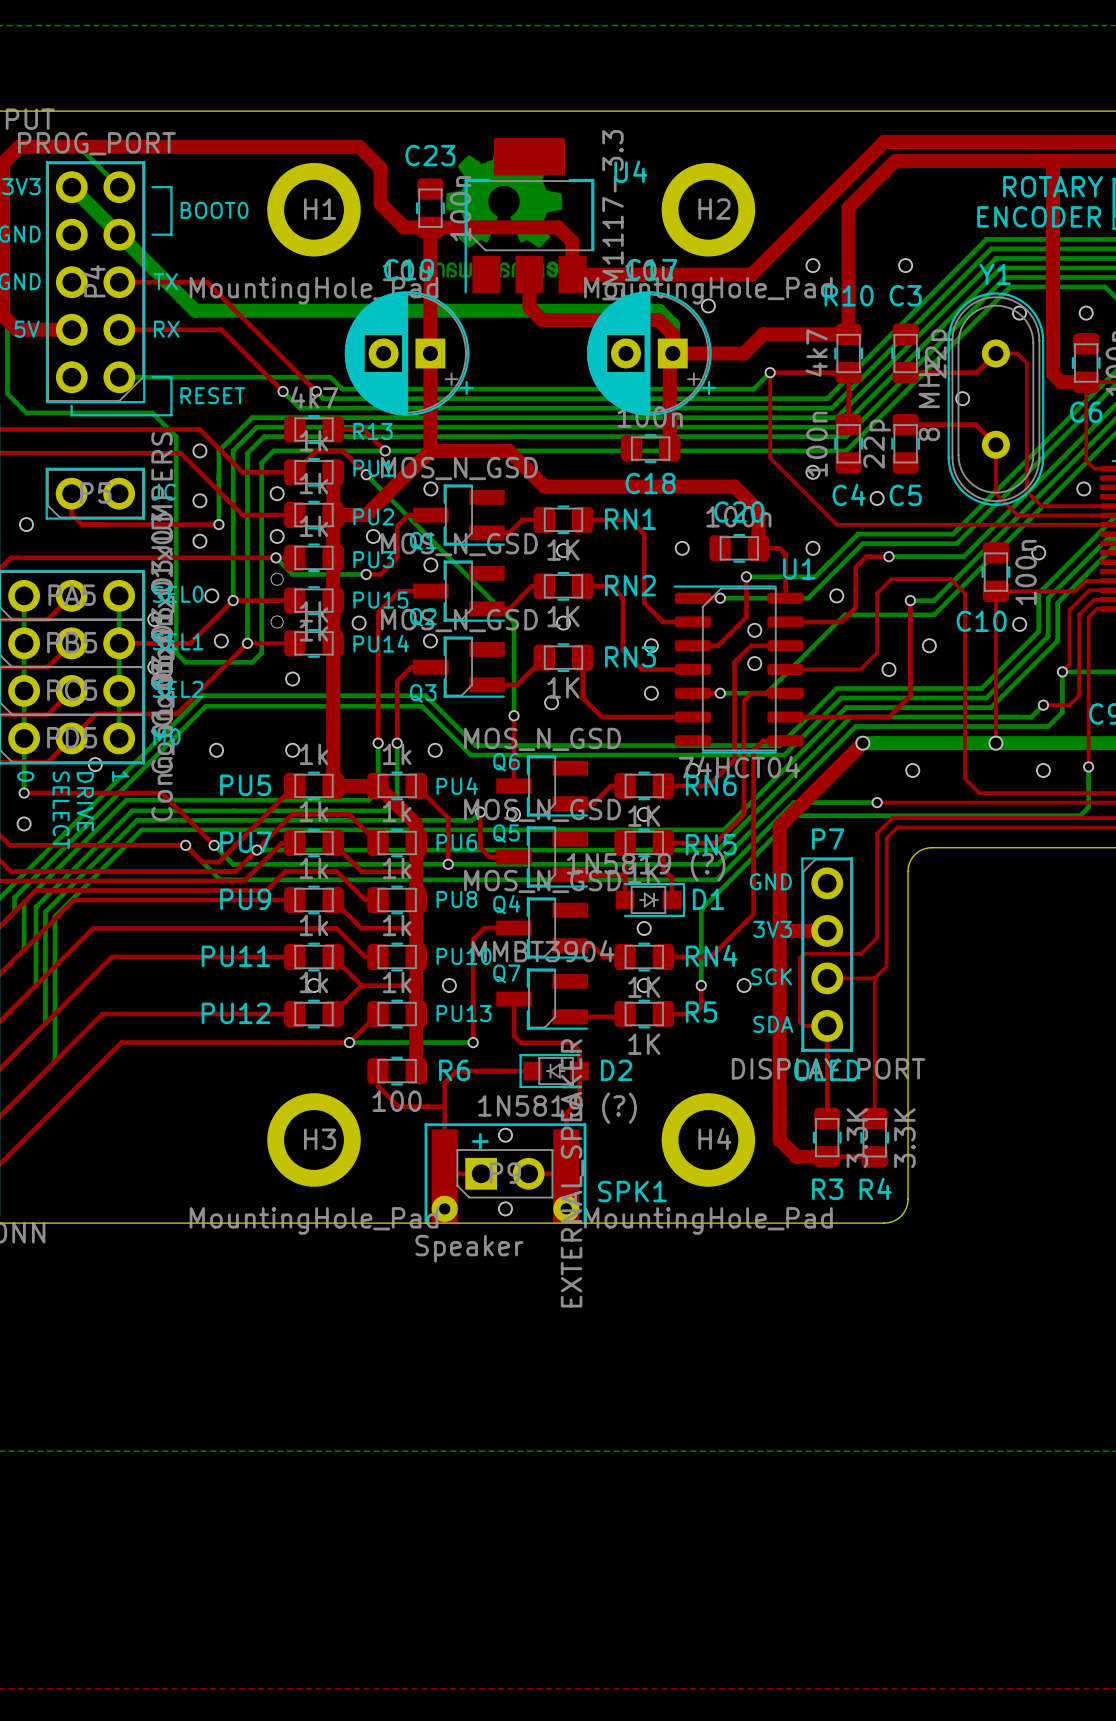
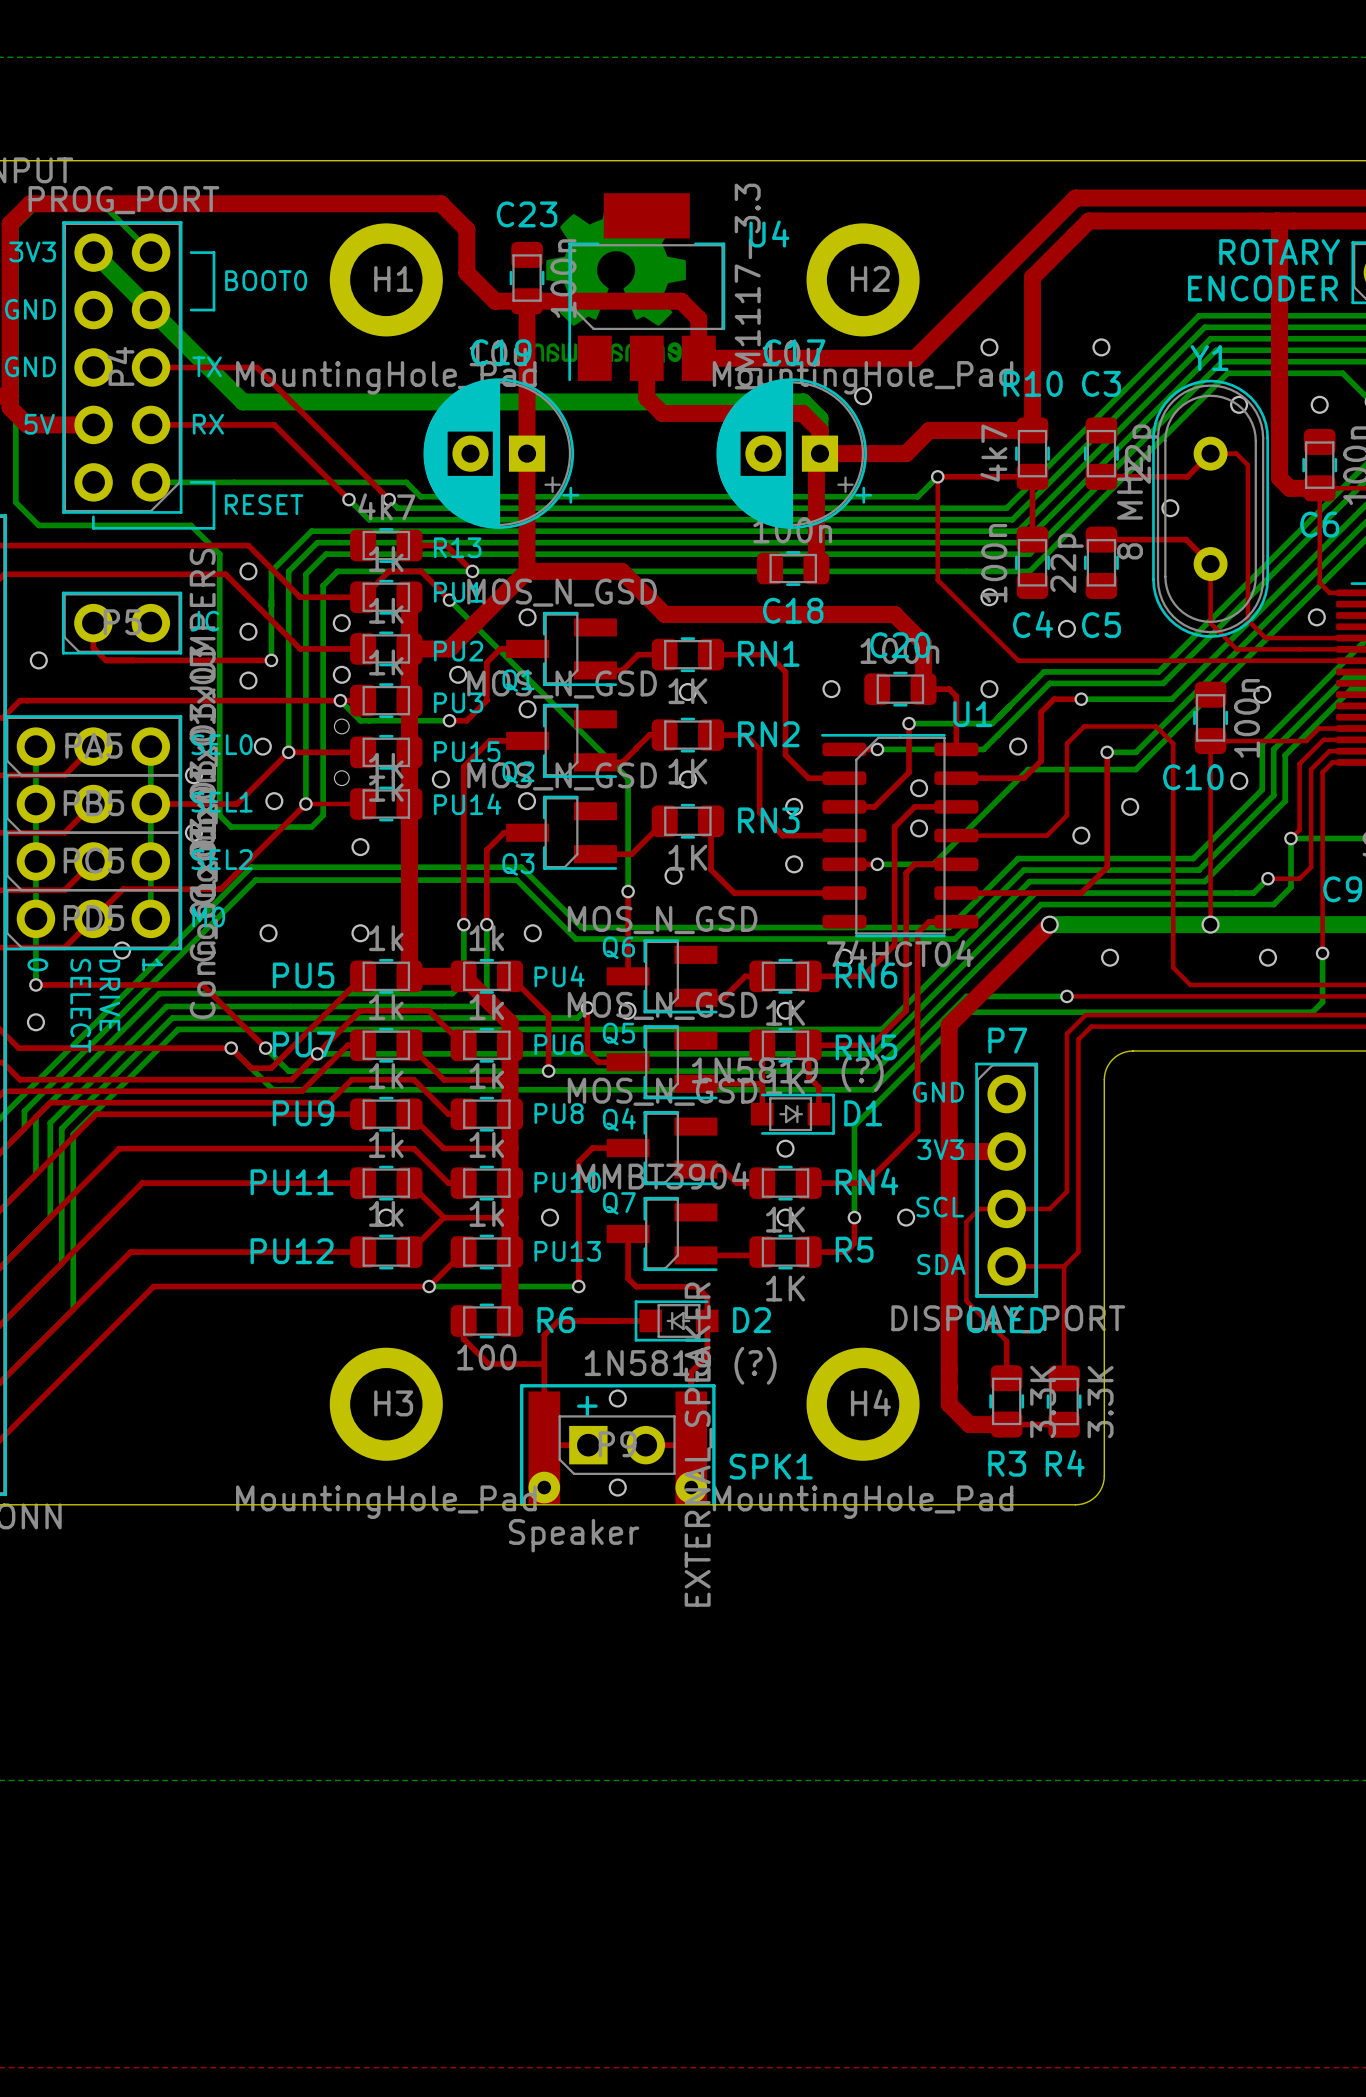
top track: (877, 938) (861, 953) (804, 953) (799, 958) (799, 1022) (803, 1025) (827, 1025) (827, 1087) -> (1006, 1208) (979, 1208) (966, 1221) (966, 1300) (1006, 1341)
top track: (886, 966) (874, 978) -> (1078, 1194) (1078, 1252) (1064, 1266) (1006, 1266)
text: SCK (771, 976) -> SCL (940, 1207)
top track: (862, 978) (874, 978) -> (1049, 1208) (1066, 1191) (1066, 1160)
top track: (874, 978) (874, 1025) -> none

